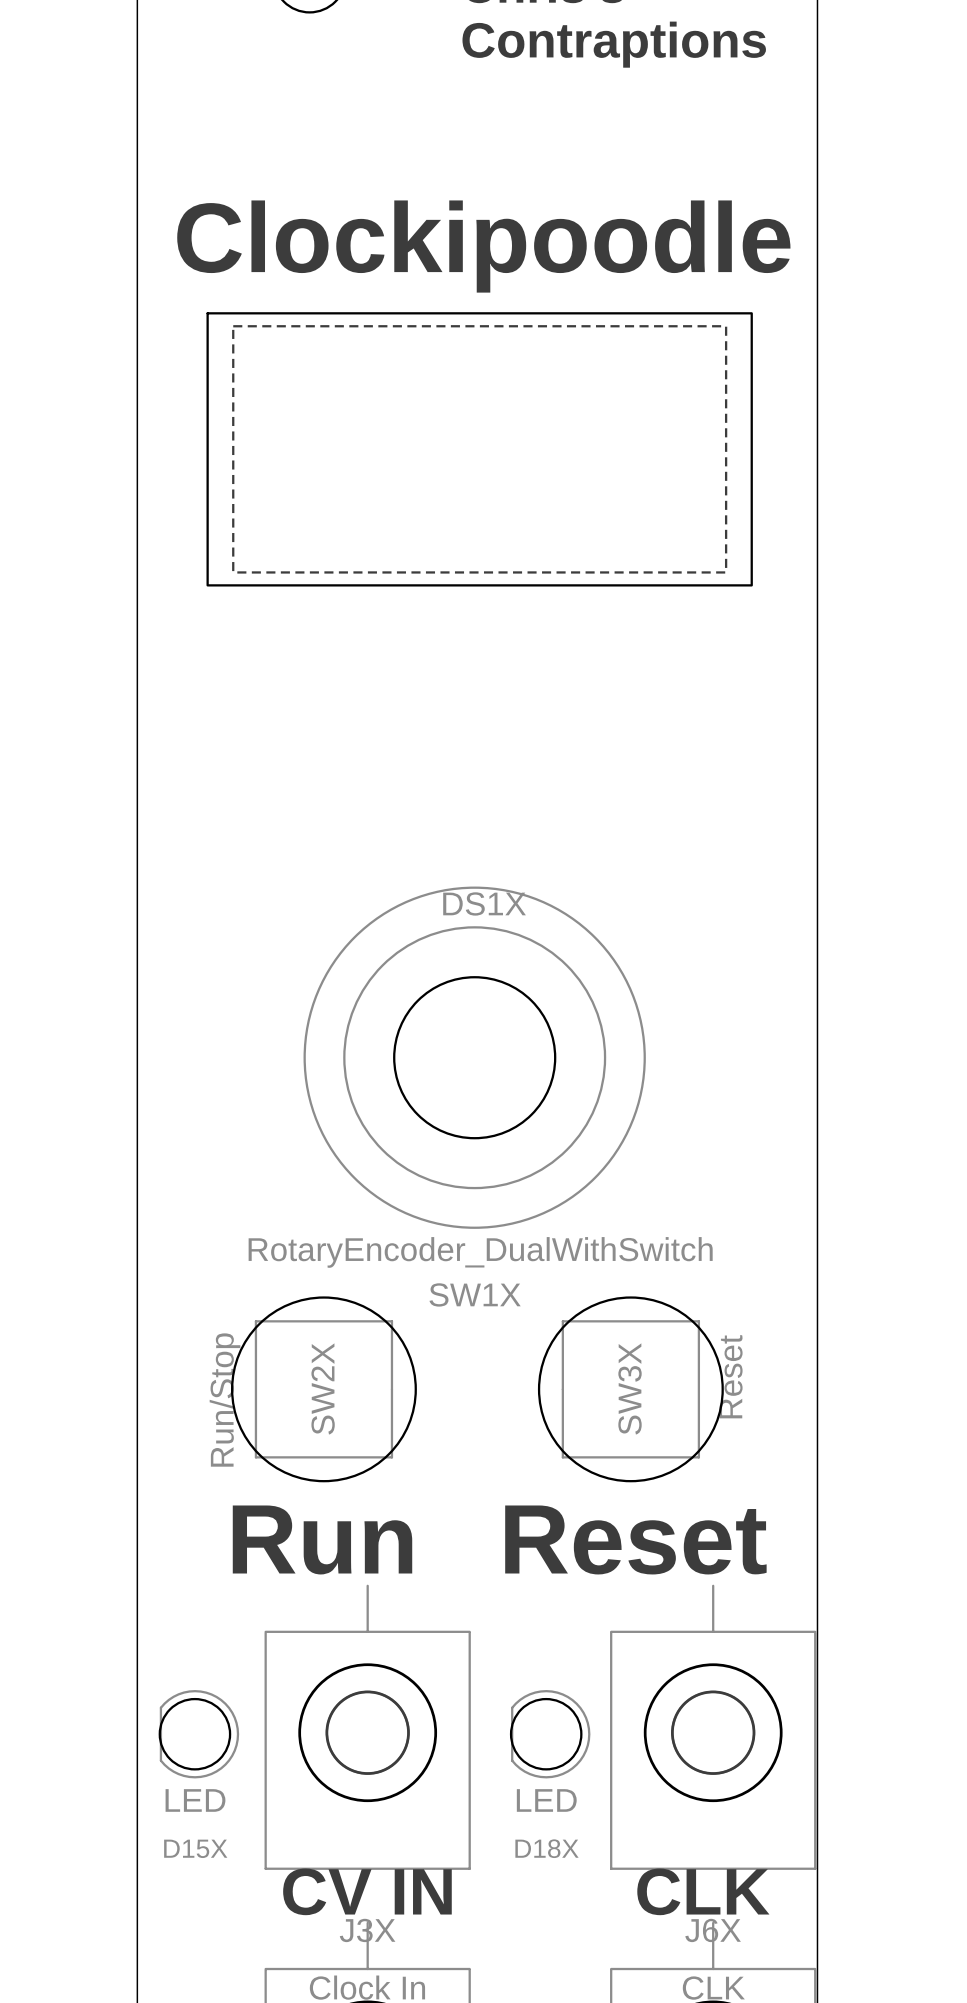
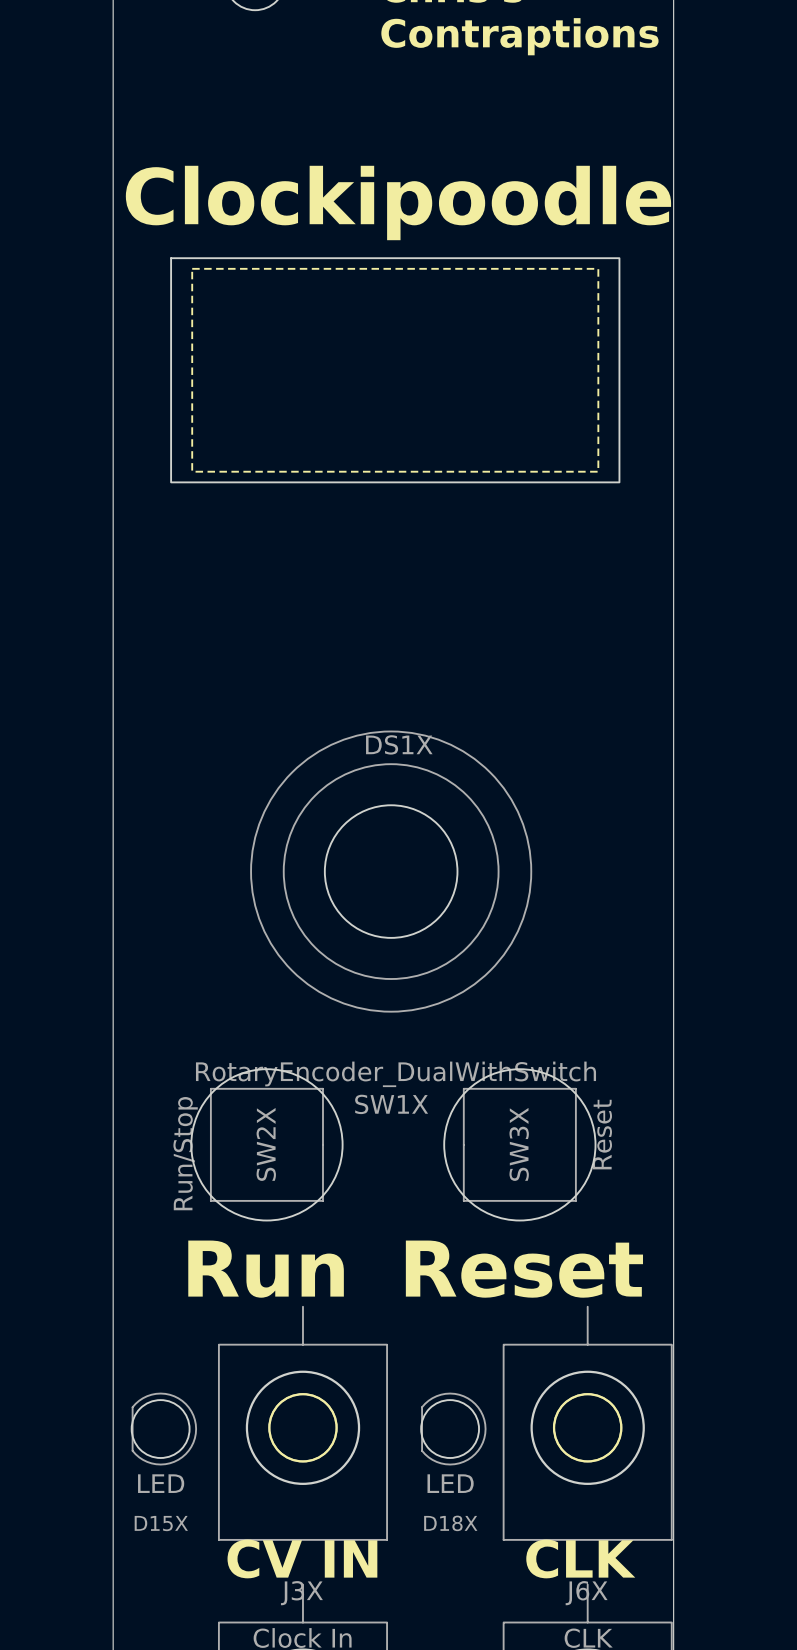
SW1X value position: RotaryEncoder_DualWithSwitch (480, 1252) -> RotaryEncoder_DualWithSwitch (396, 1074)
SW1X name position: SW1X (475, 1294) -> SW1X (391, 1104)

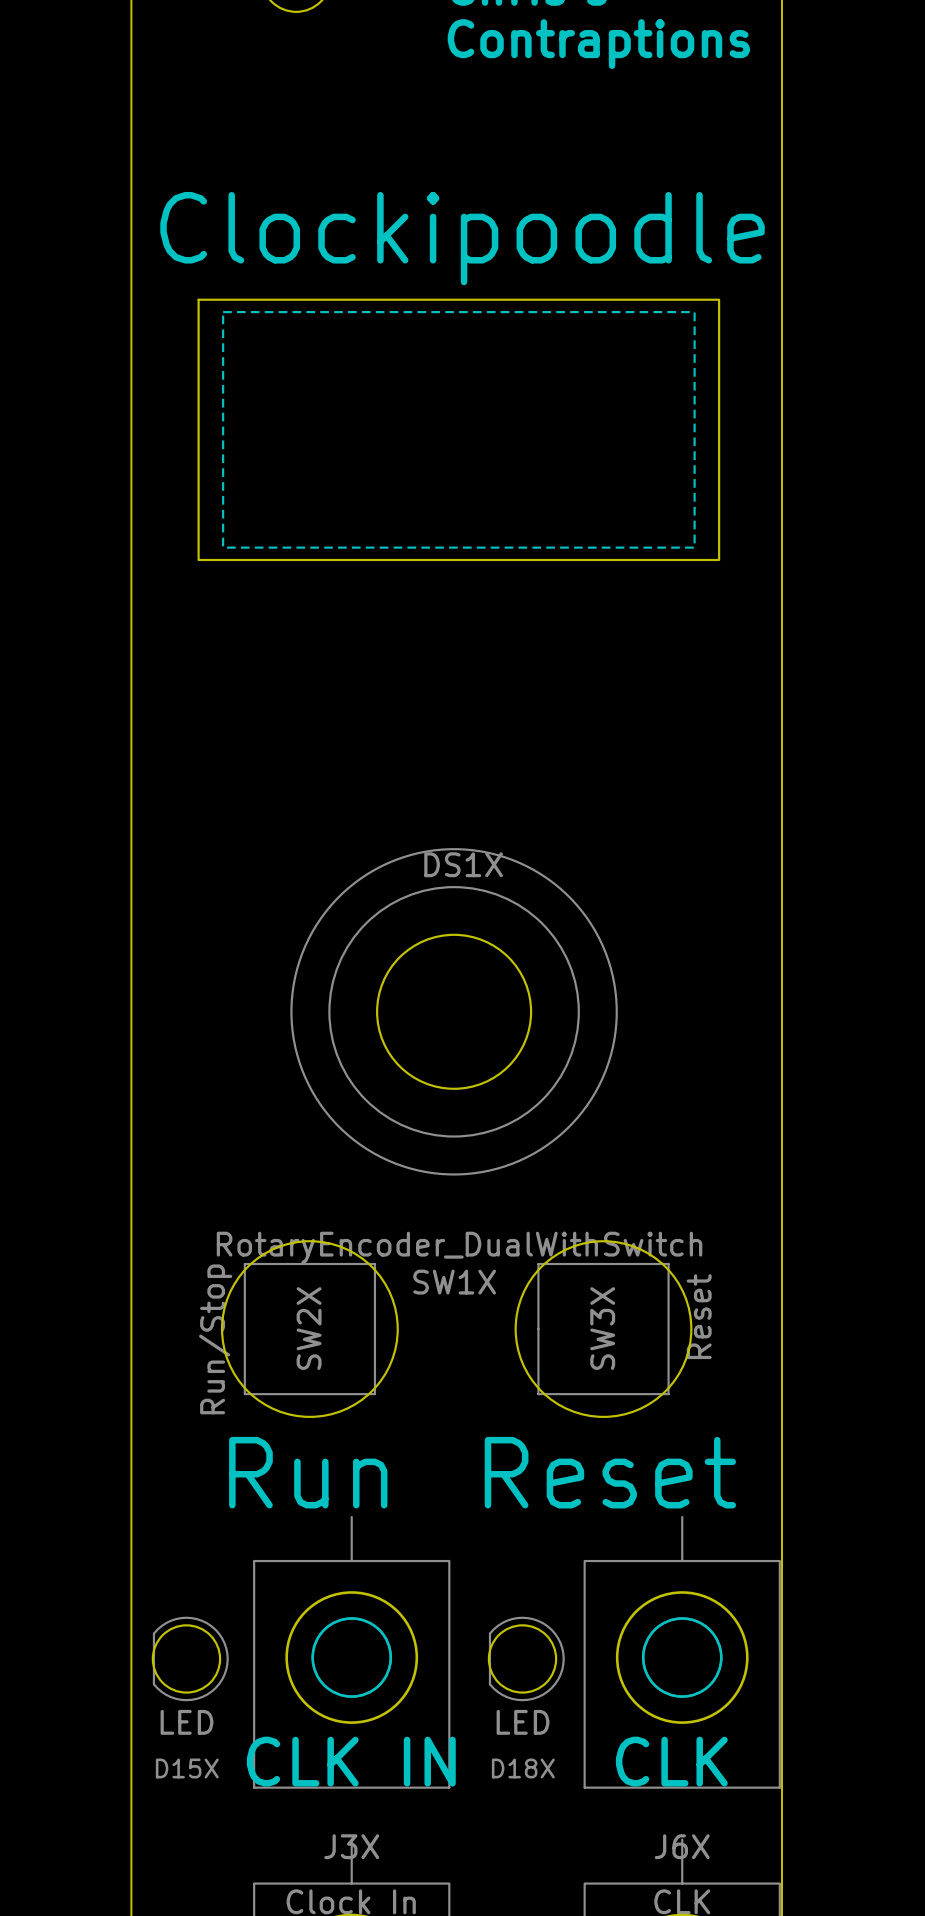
text: CV IN (302, 1558) -> CLK IN (351, 1761)
text position: CLK (580, 1558) -> CLK (671, 1761)

